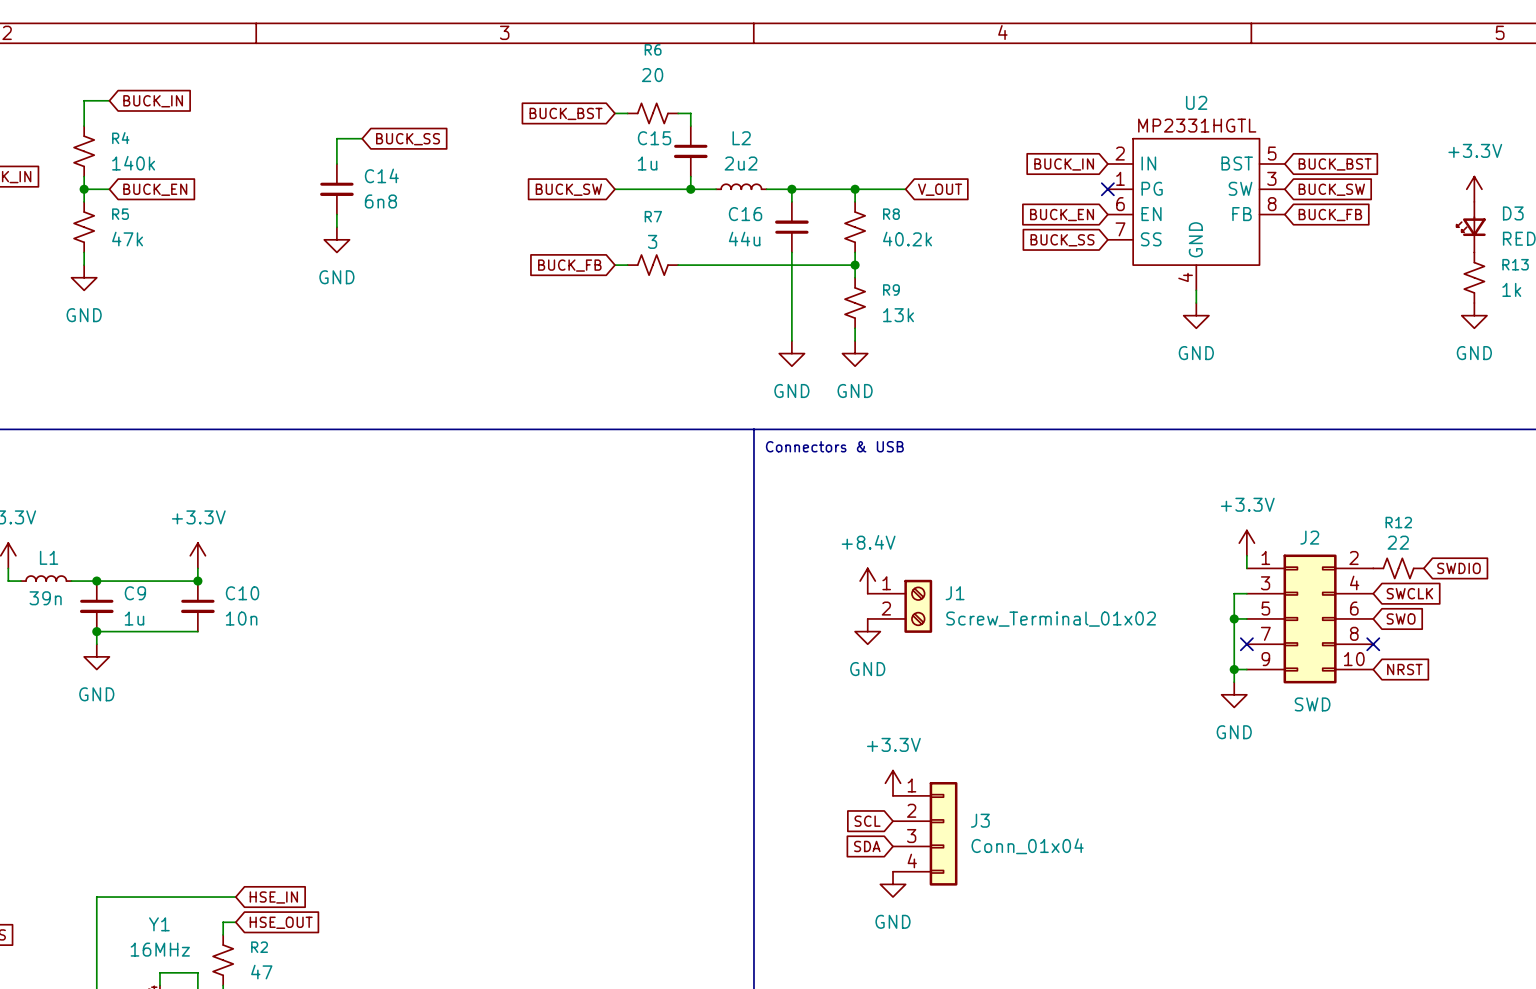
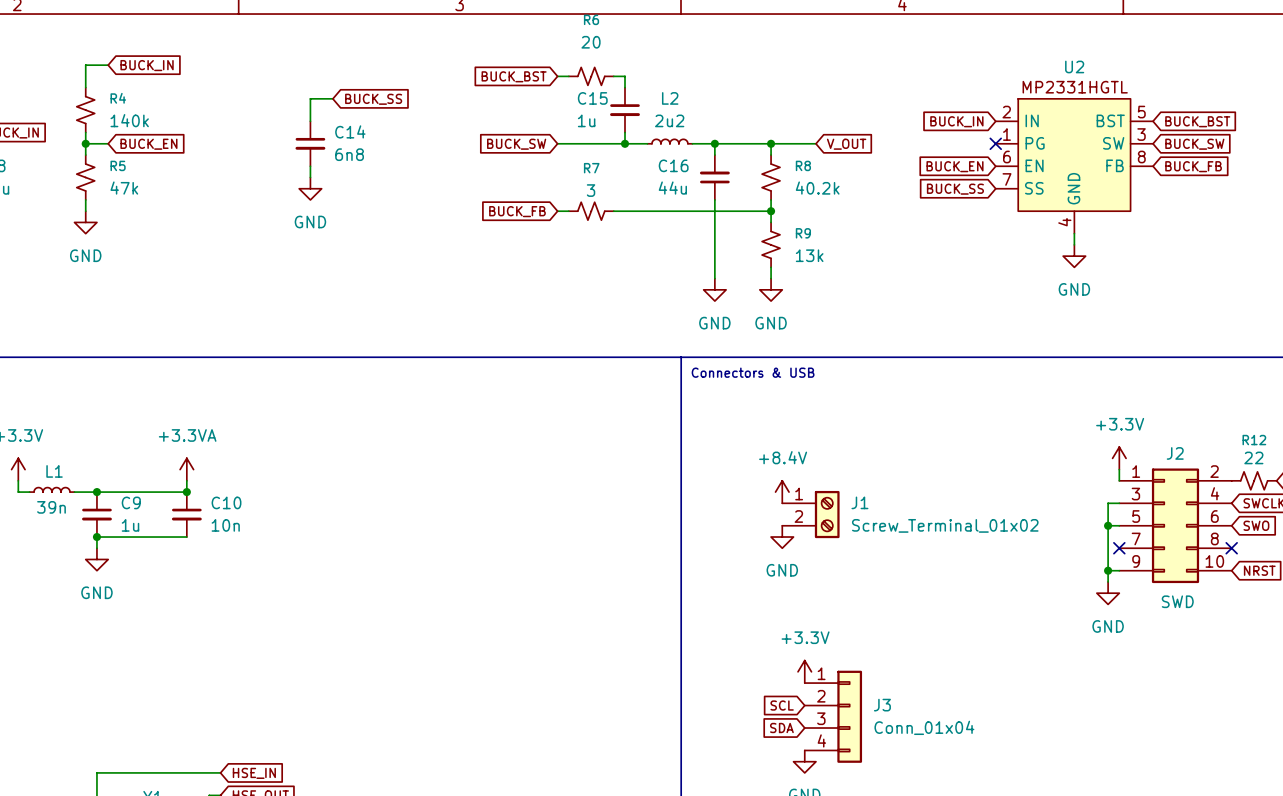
U2 symbol: [1107, 138, 1285, 291] -> [995, 98, 1154, 234]
power symbol: +3.3V (197, 555) -> +3.3VA (186, 469)

